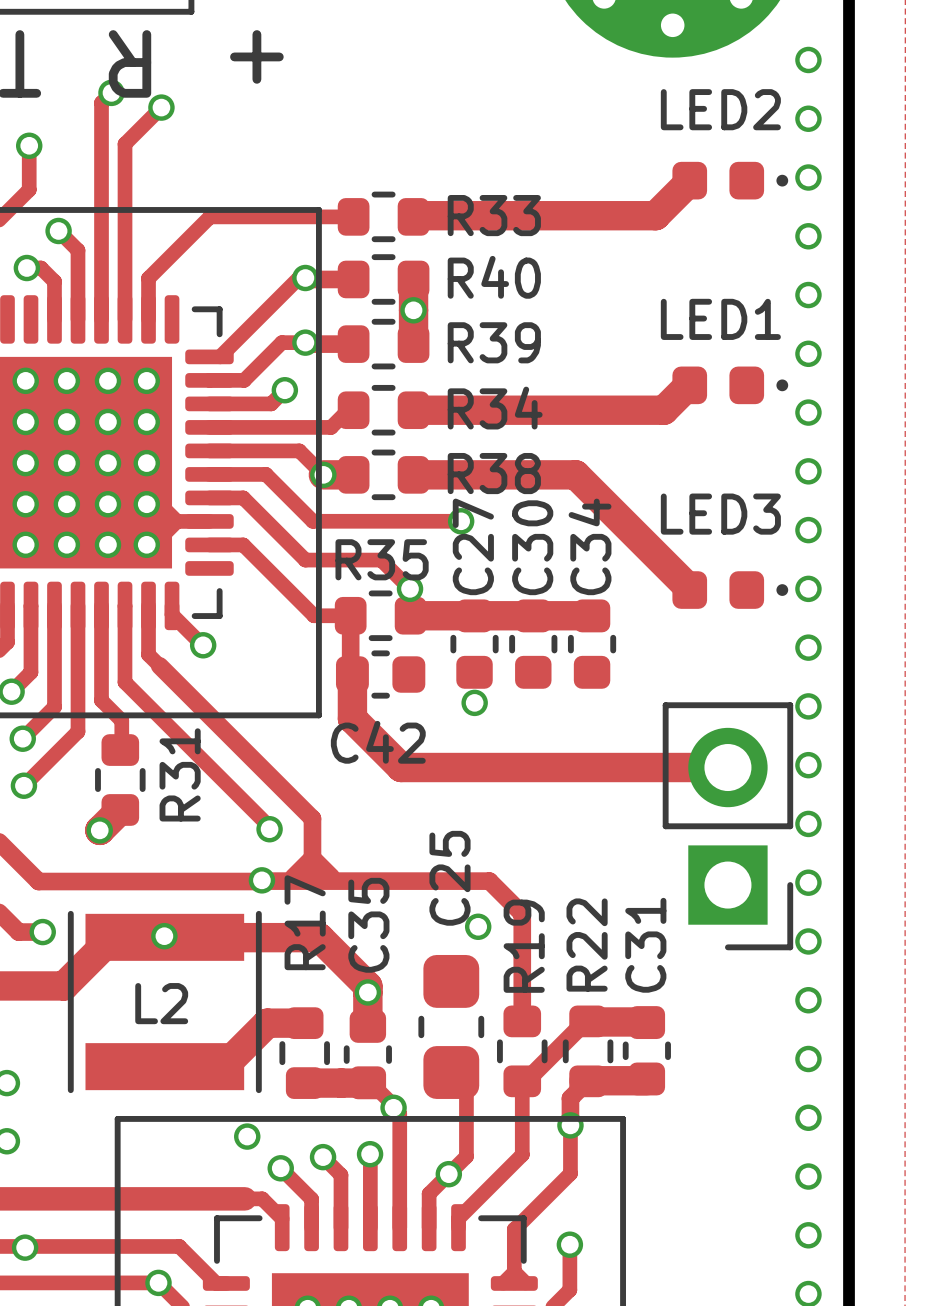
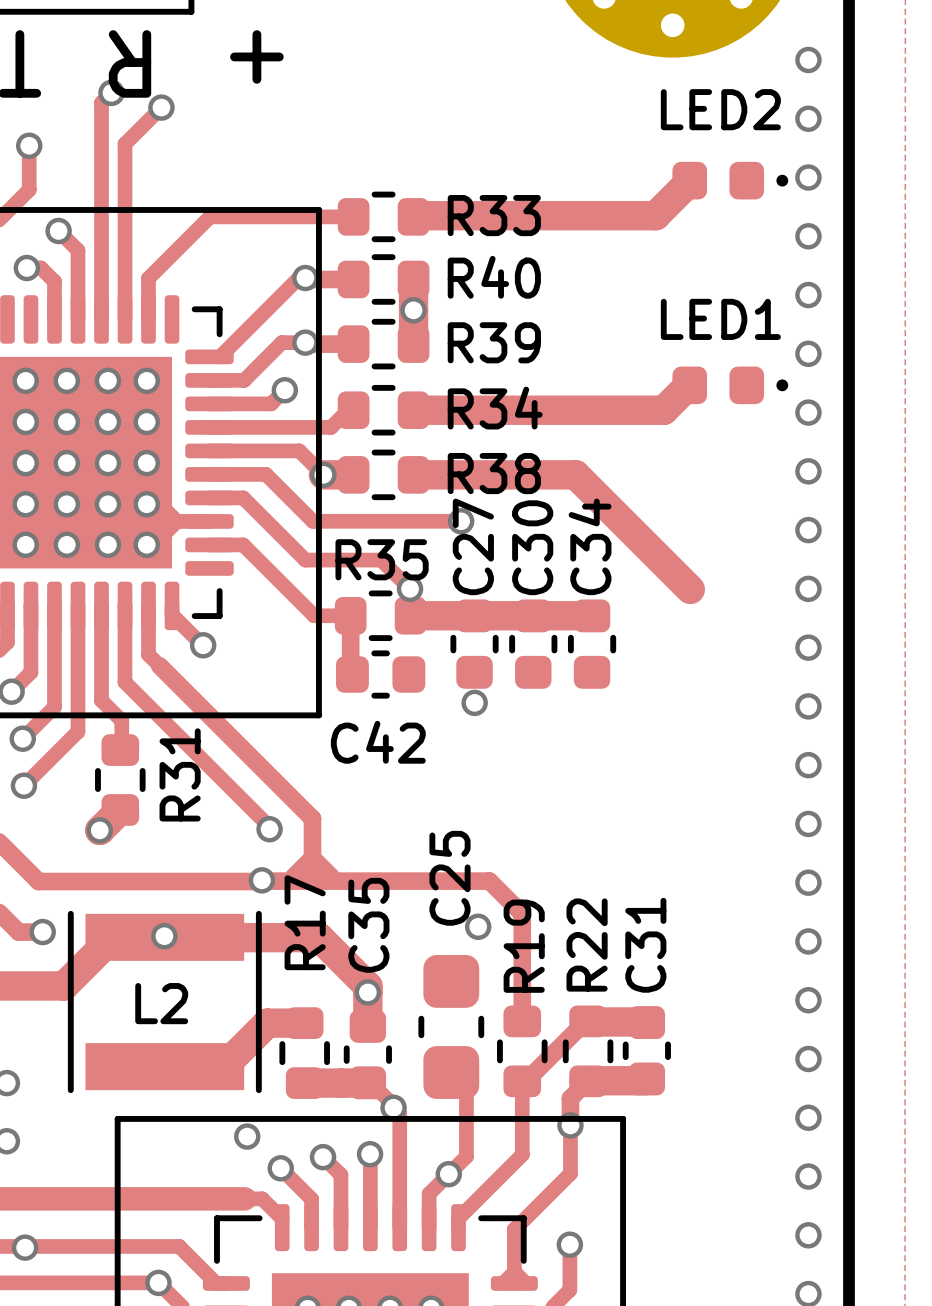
LED3: (730, 590) -> none
track: (352, 674) (352, 718) (401, 767) (748, 767) -> none
part: (727, 826) -> none

